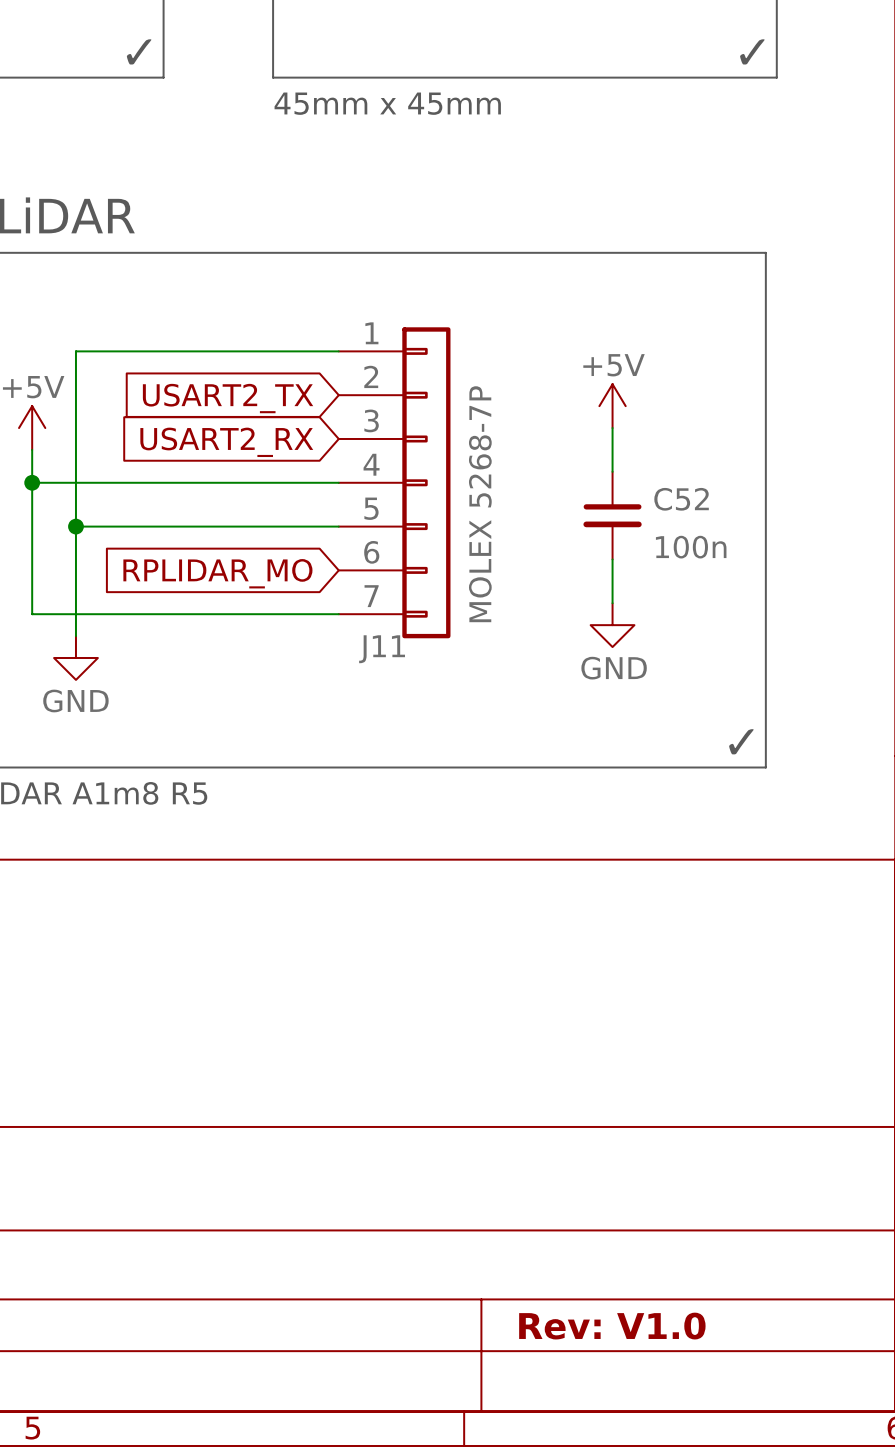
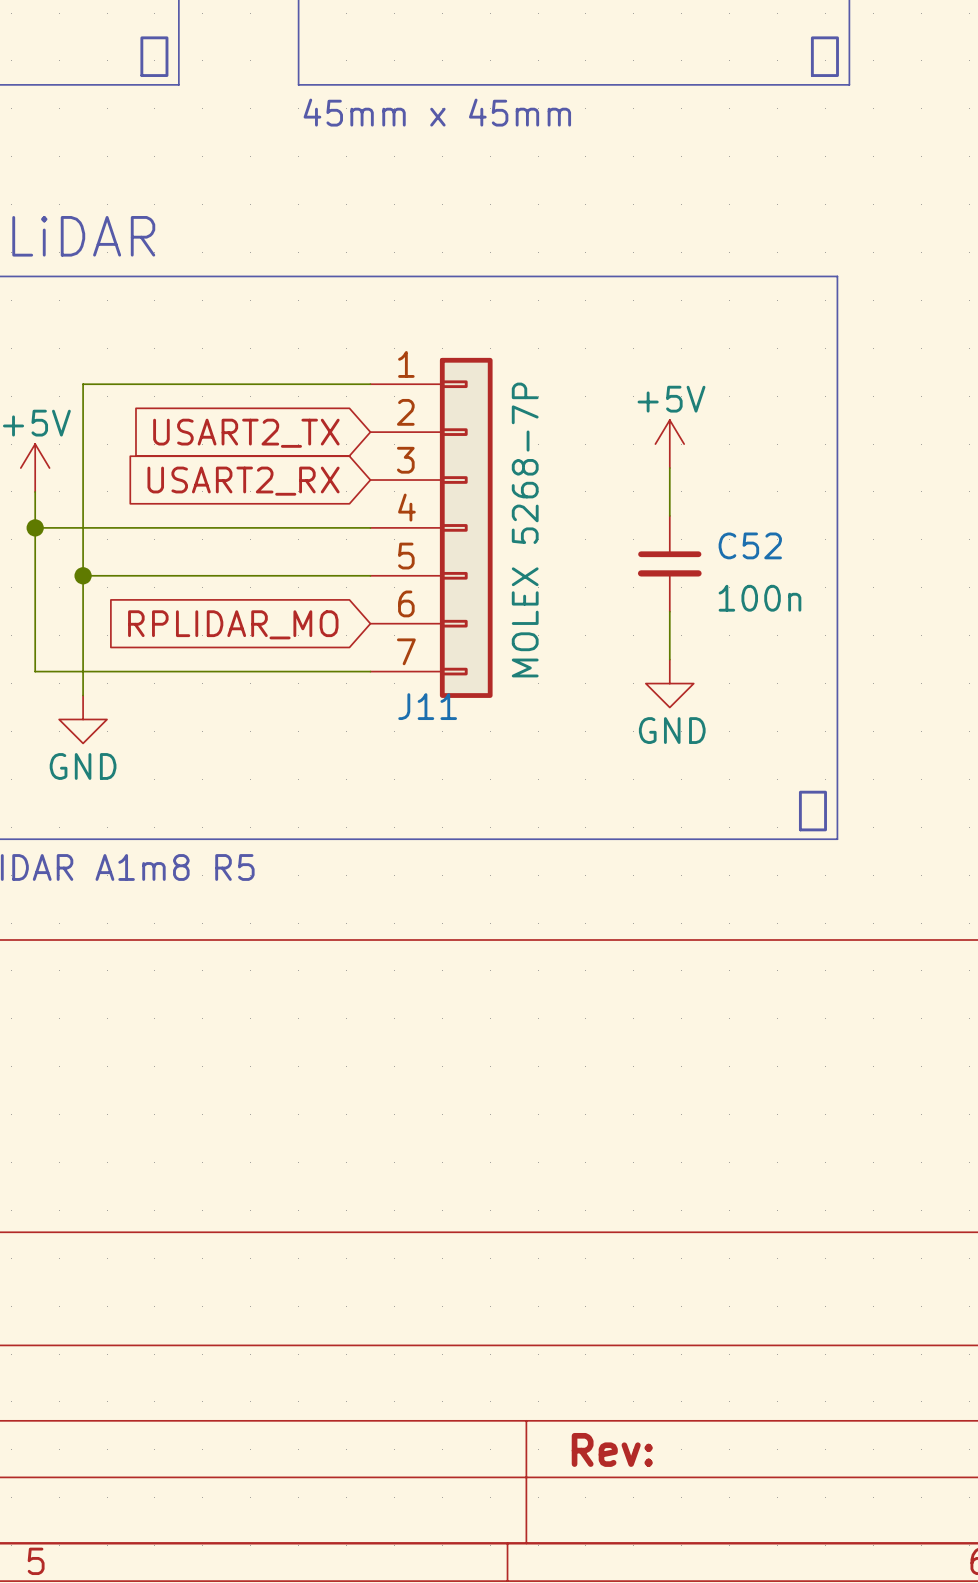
title block: Rev: V1.0 (612, 1326) -> Rev: (612, 1449)

